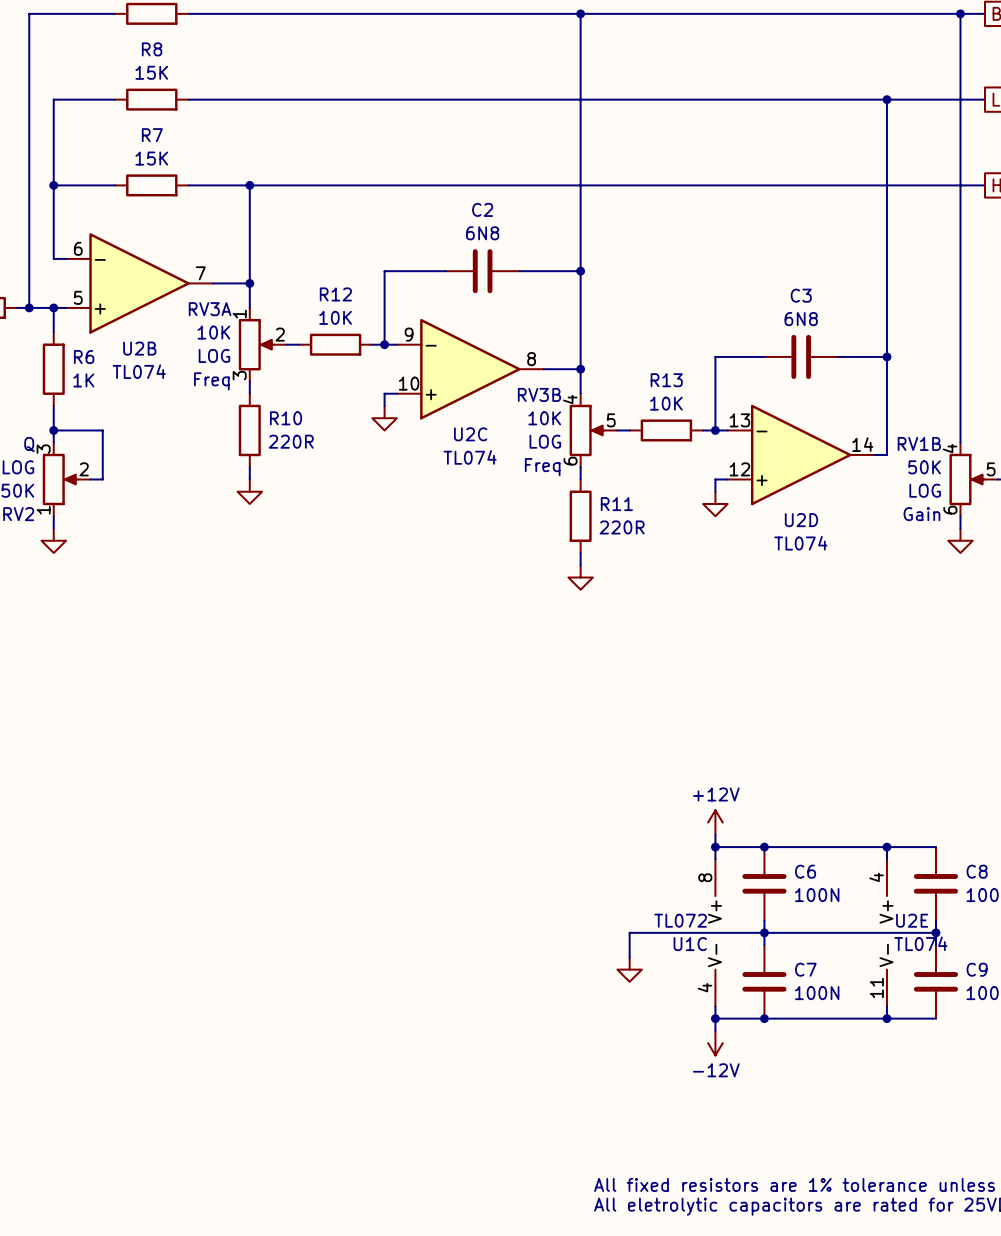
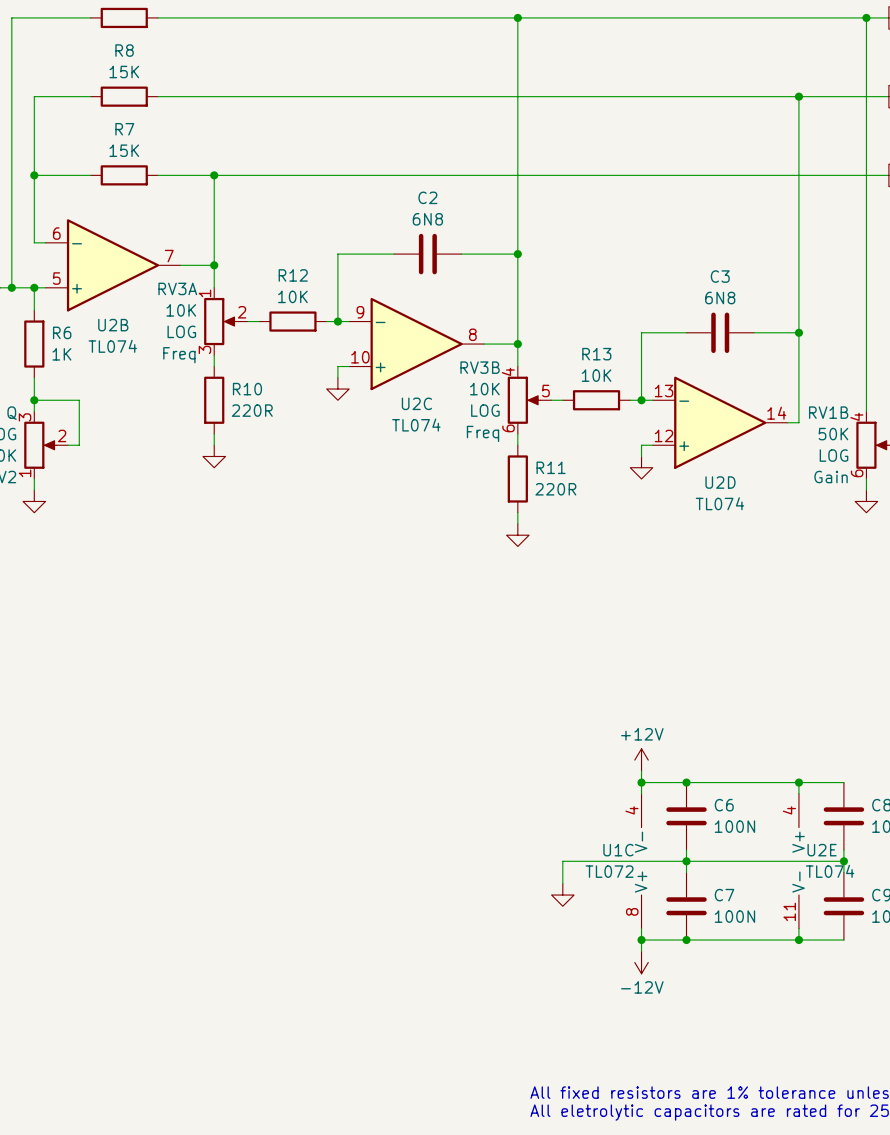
U1C value position: TL072 (680, 920) -> TL072 (609, 871)
U1C rotation: 0° (715, 932) -> 180° (641, 861)
U1C name position: U1C (690, 944) -> U1C (618, 850)

